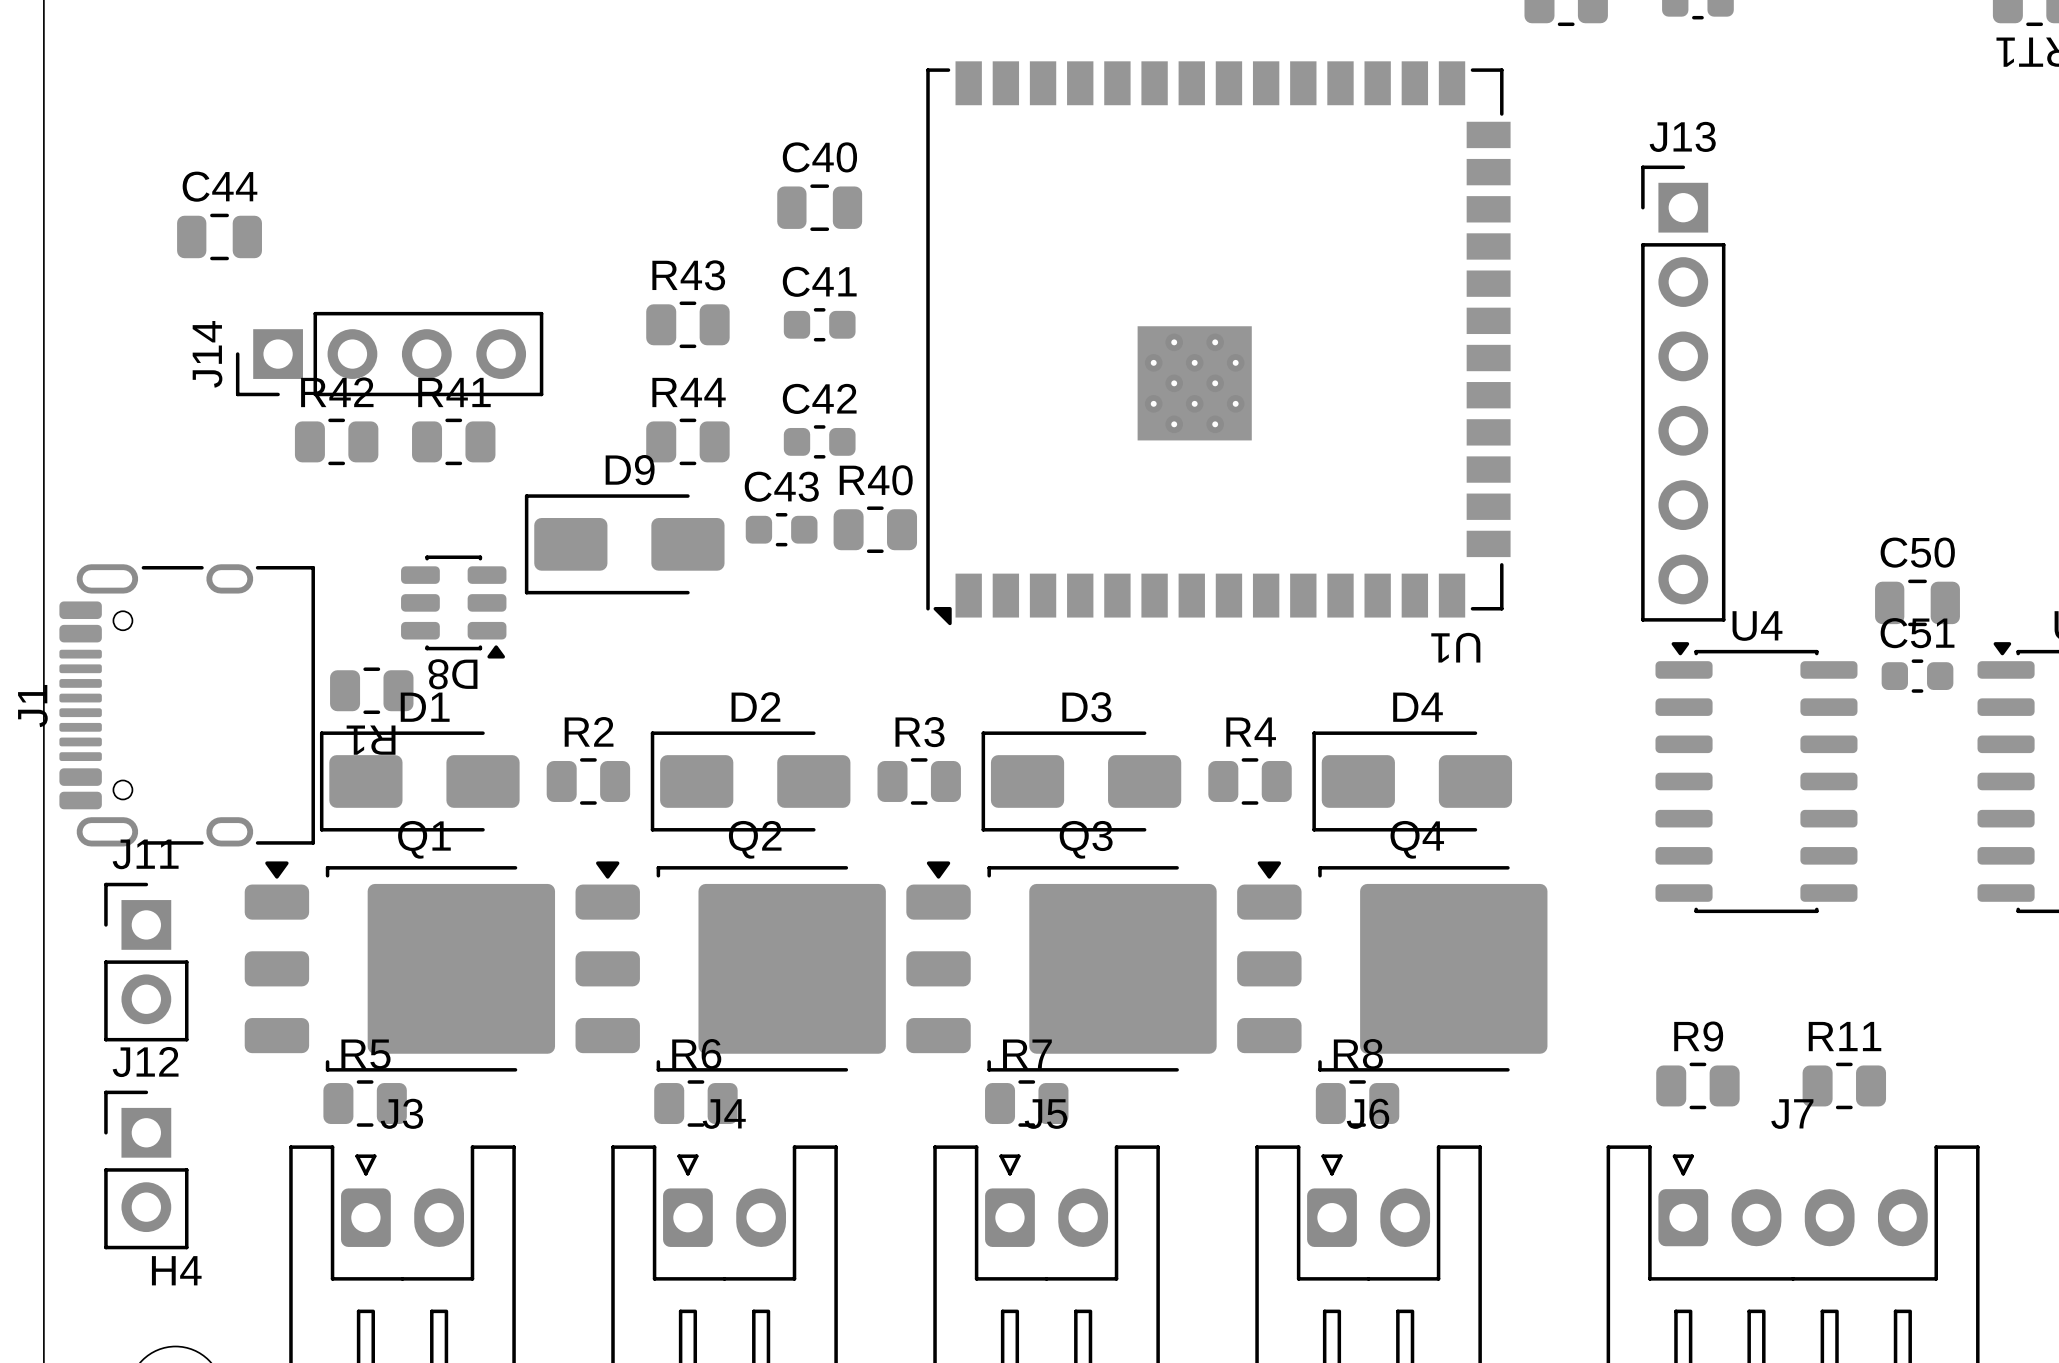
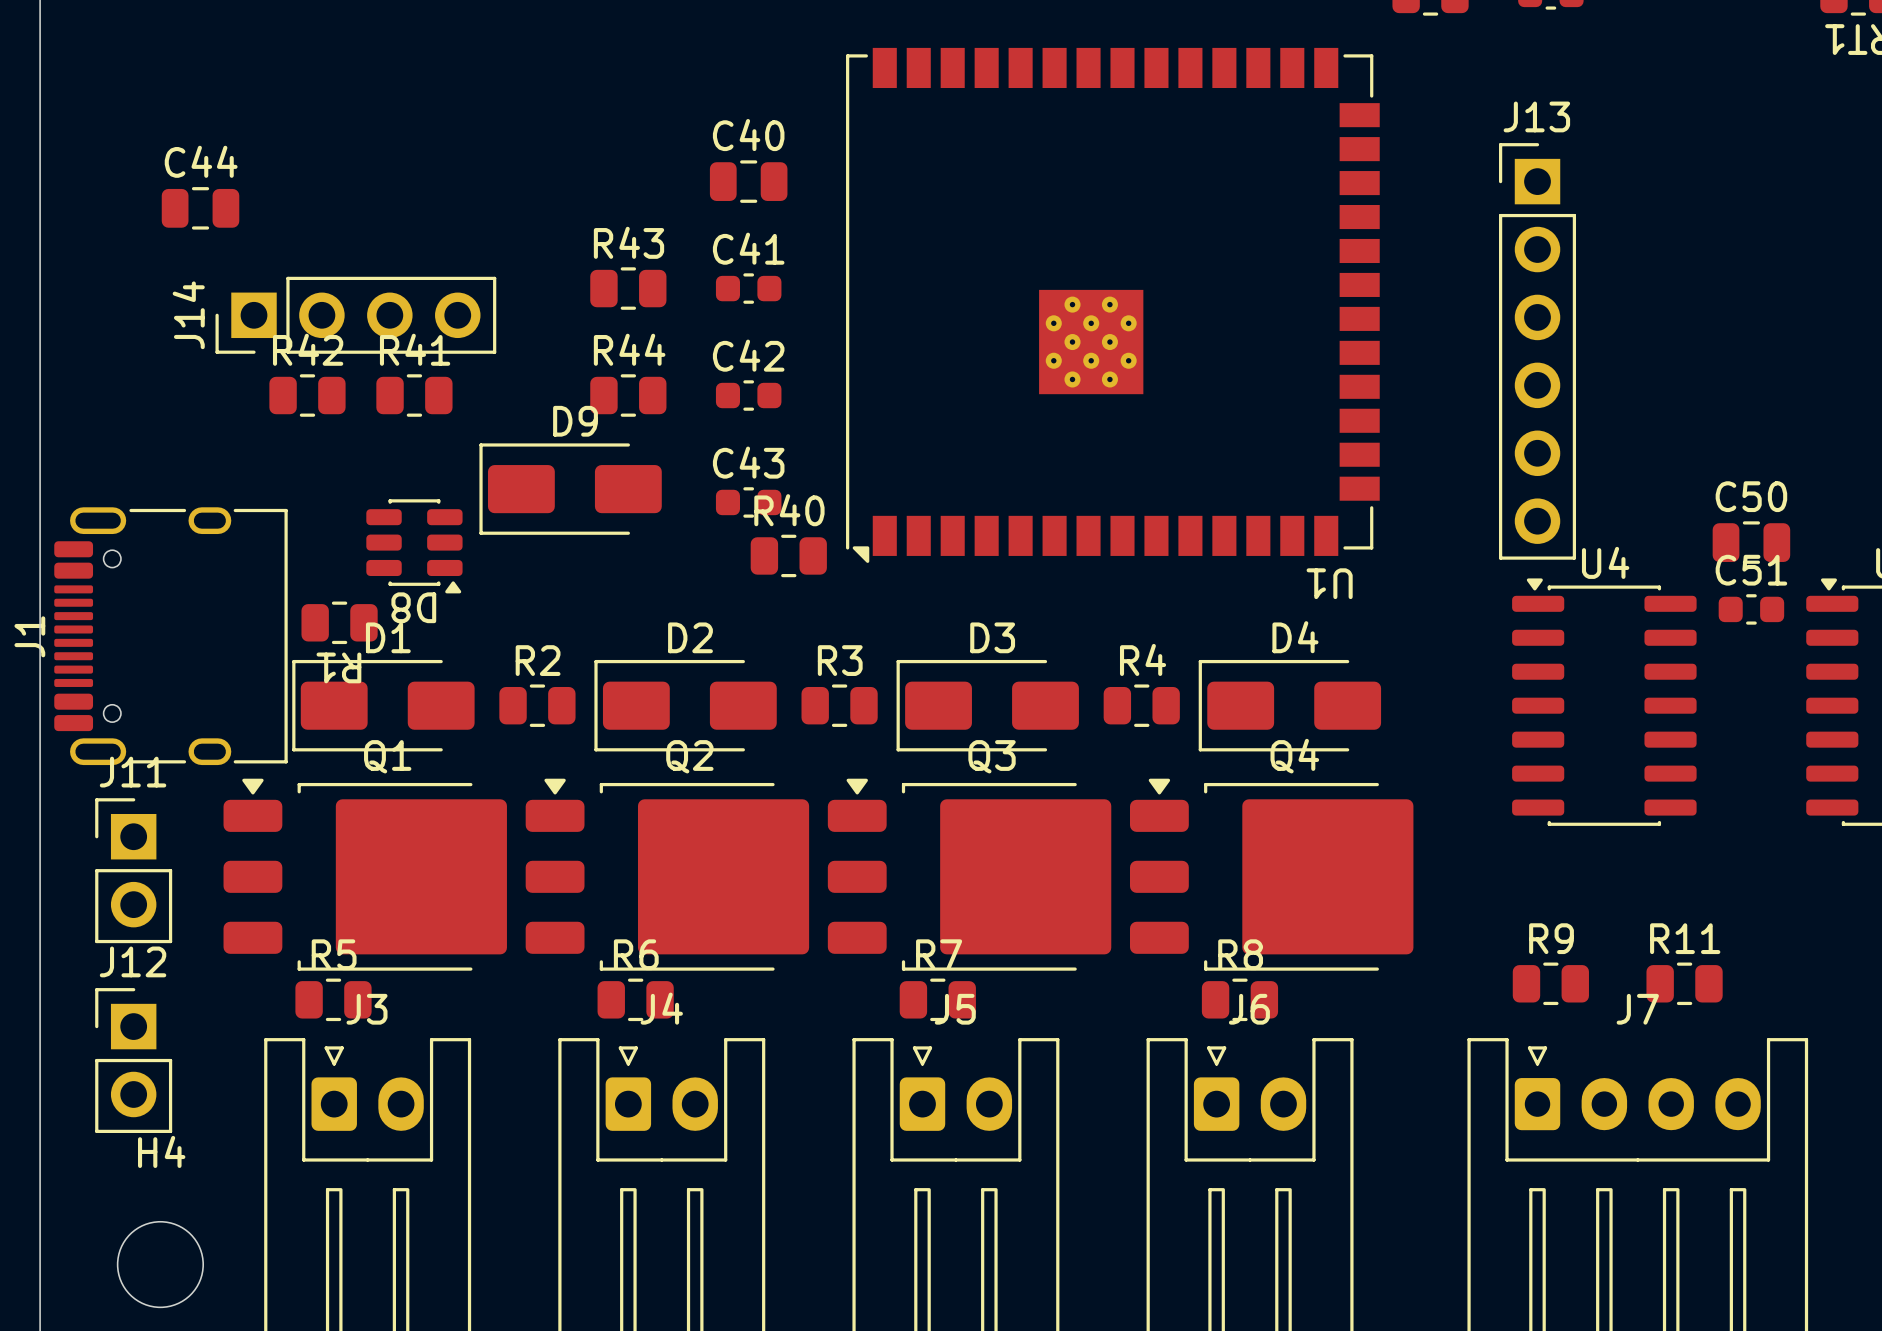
C43 position: (781, 529) -> (748, 502)
R40 position: (875, 529) -> (788, 555)

